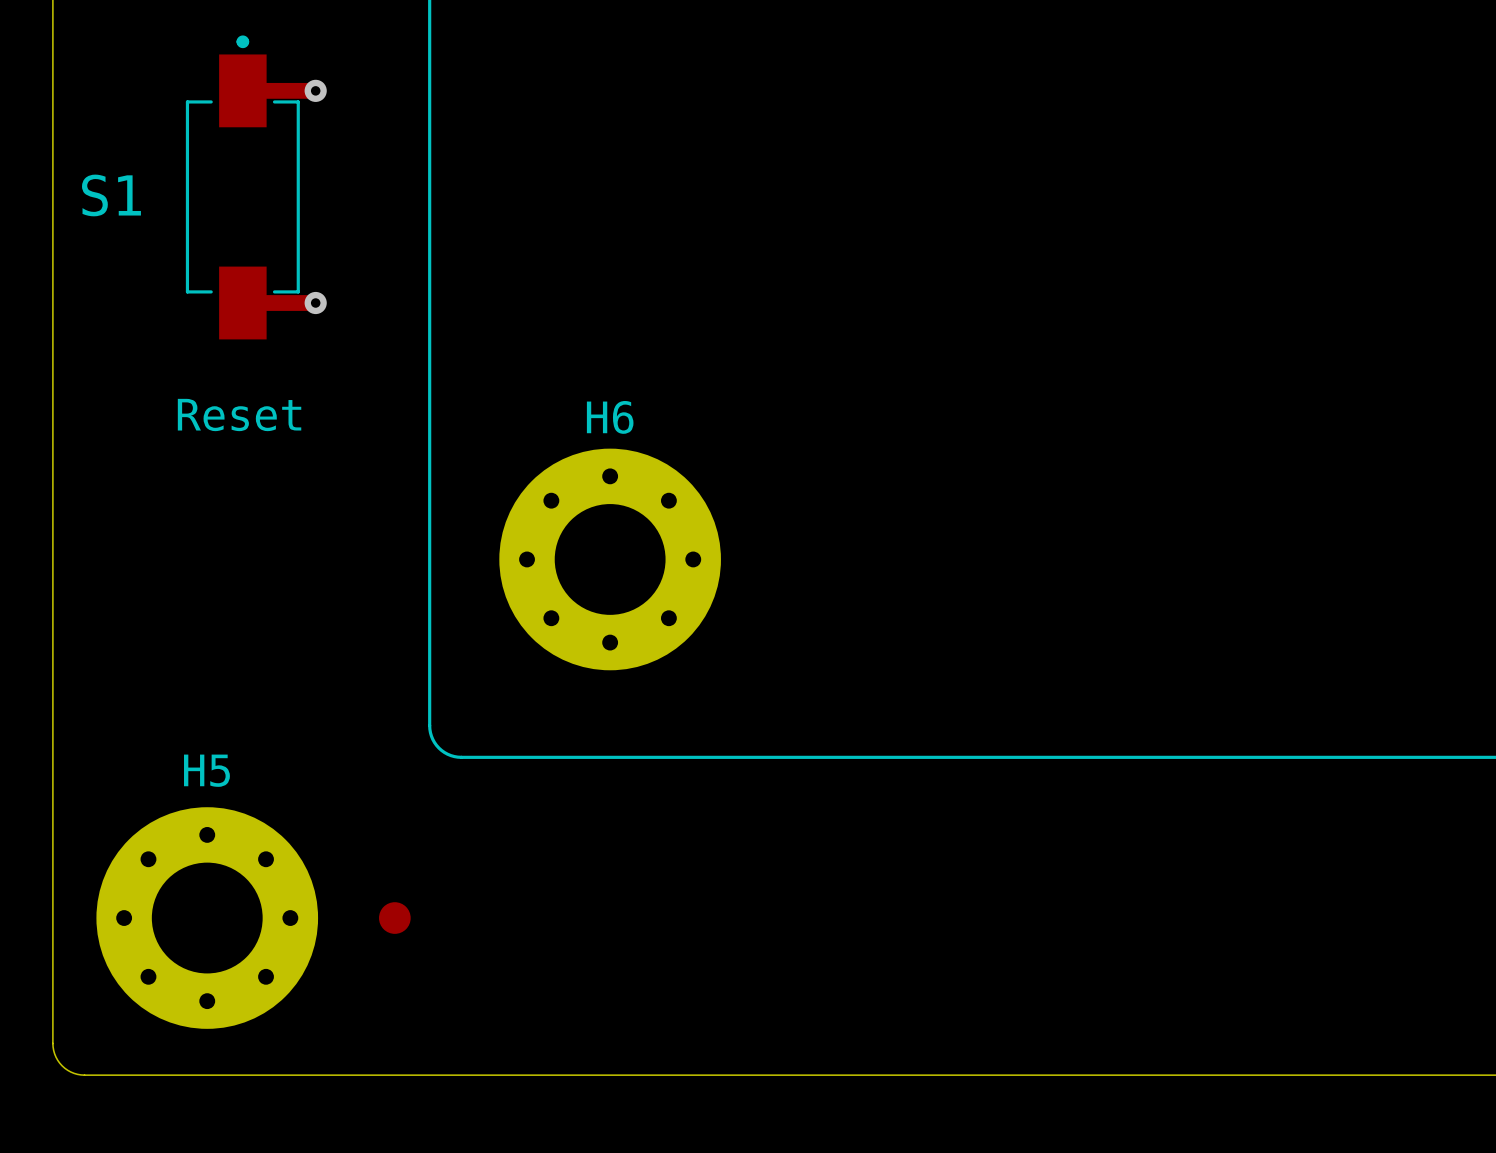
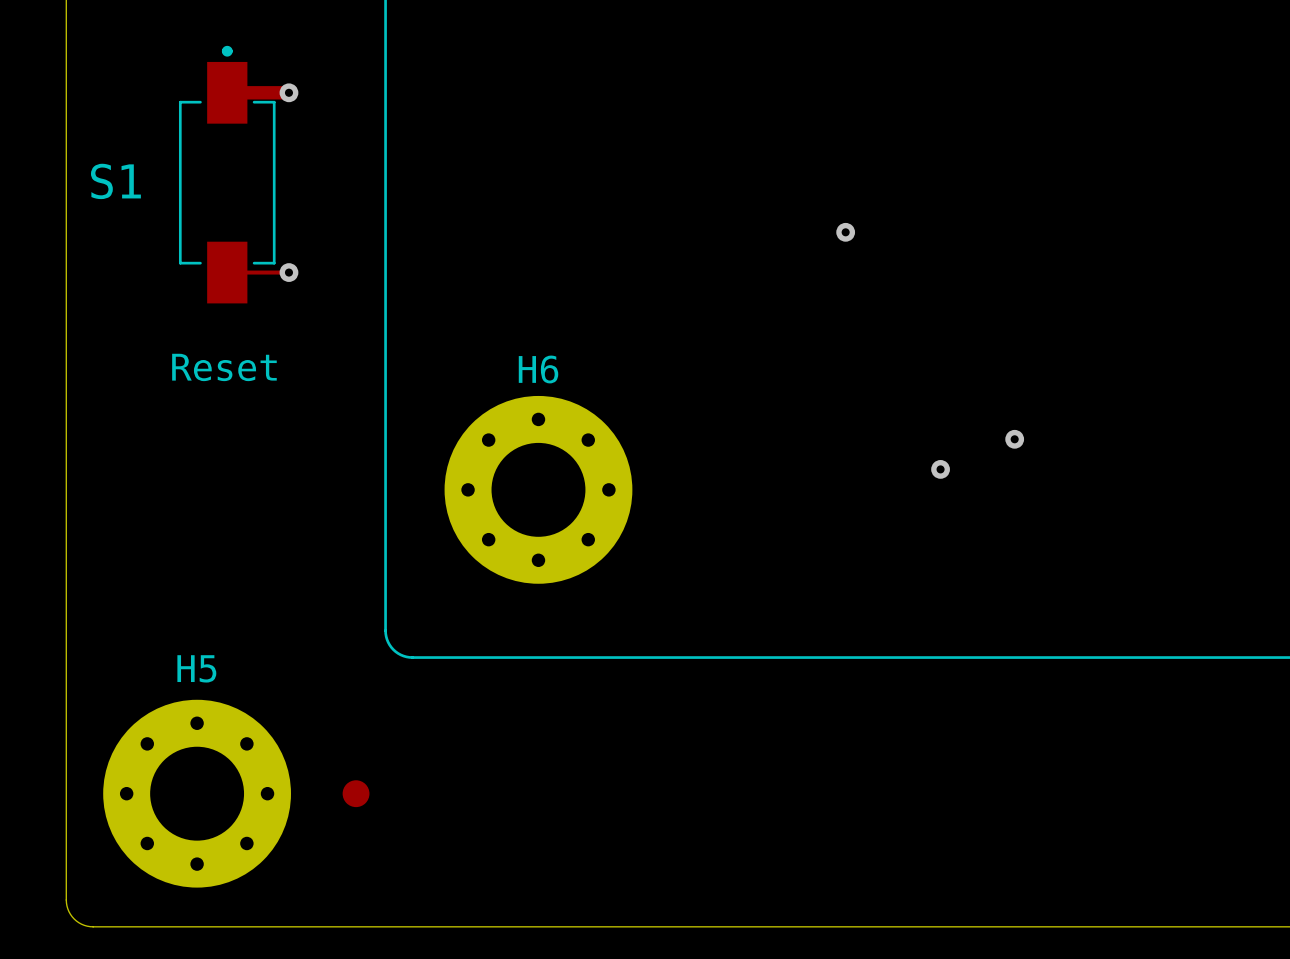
via: none -> (845, 232)
track width: thick (242, 303) (315, 303) -> thin (227, 272) (288, 272)
via: none -> (1014, 439)
via: none -> (940, 469)

